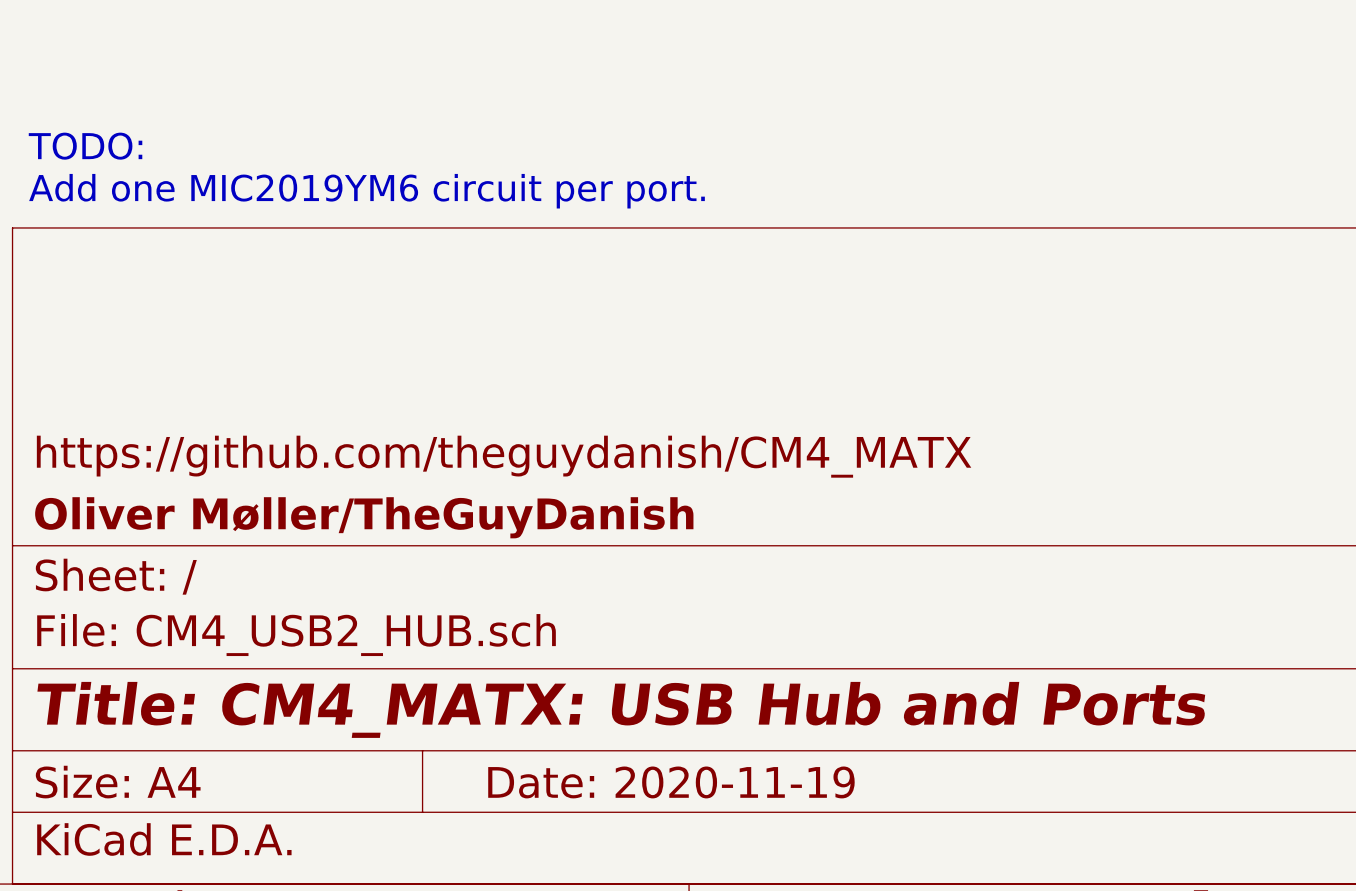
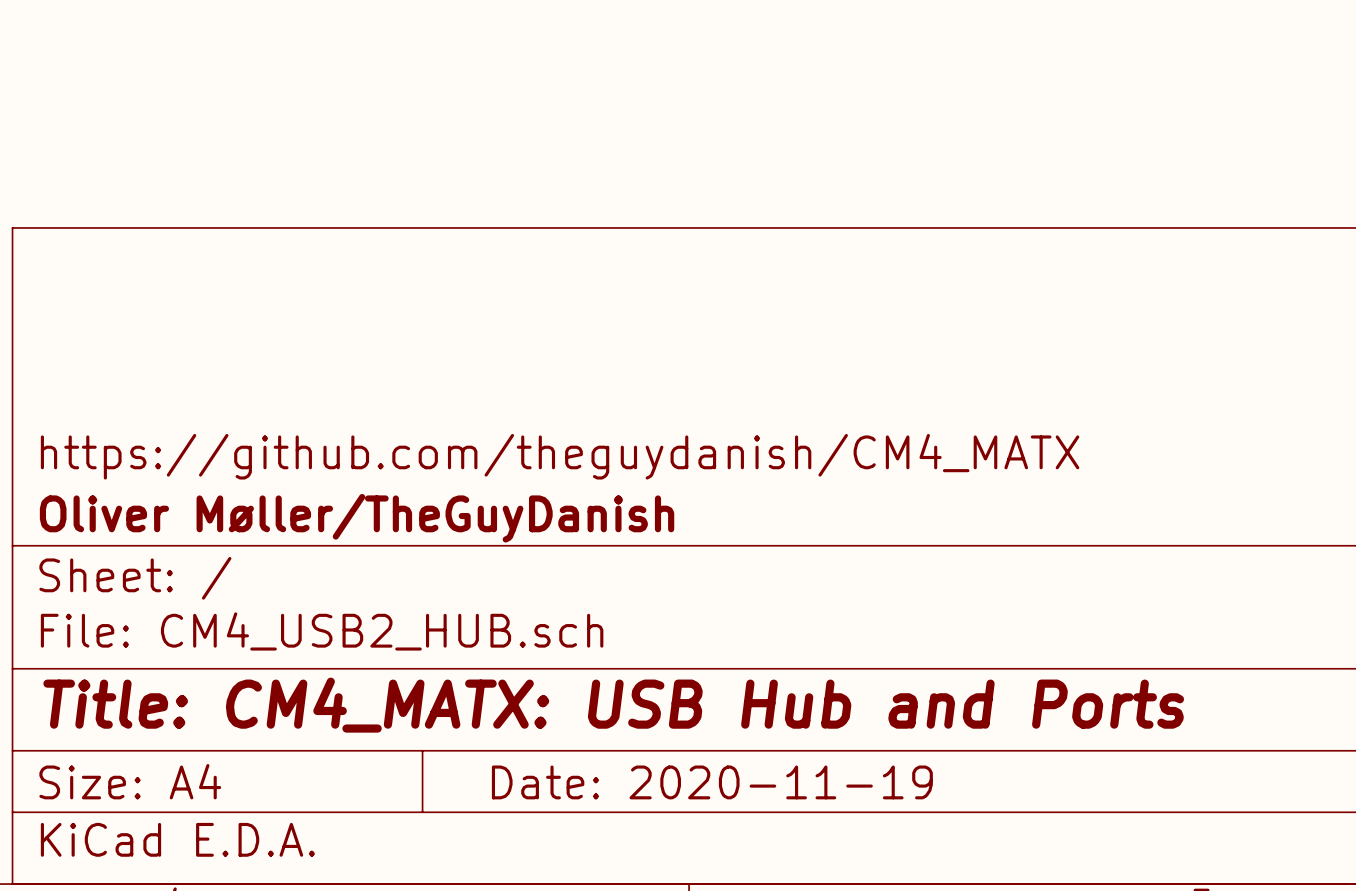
text: TODO: (85, 146) -> none
text: Add one MIC2019YM6 circuit per port. (367, 191) -> none

